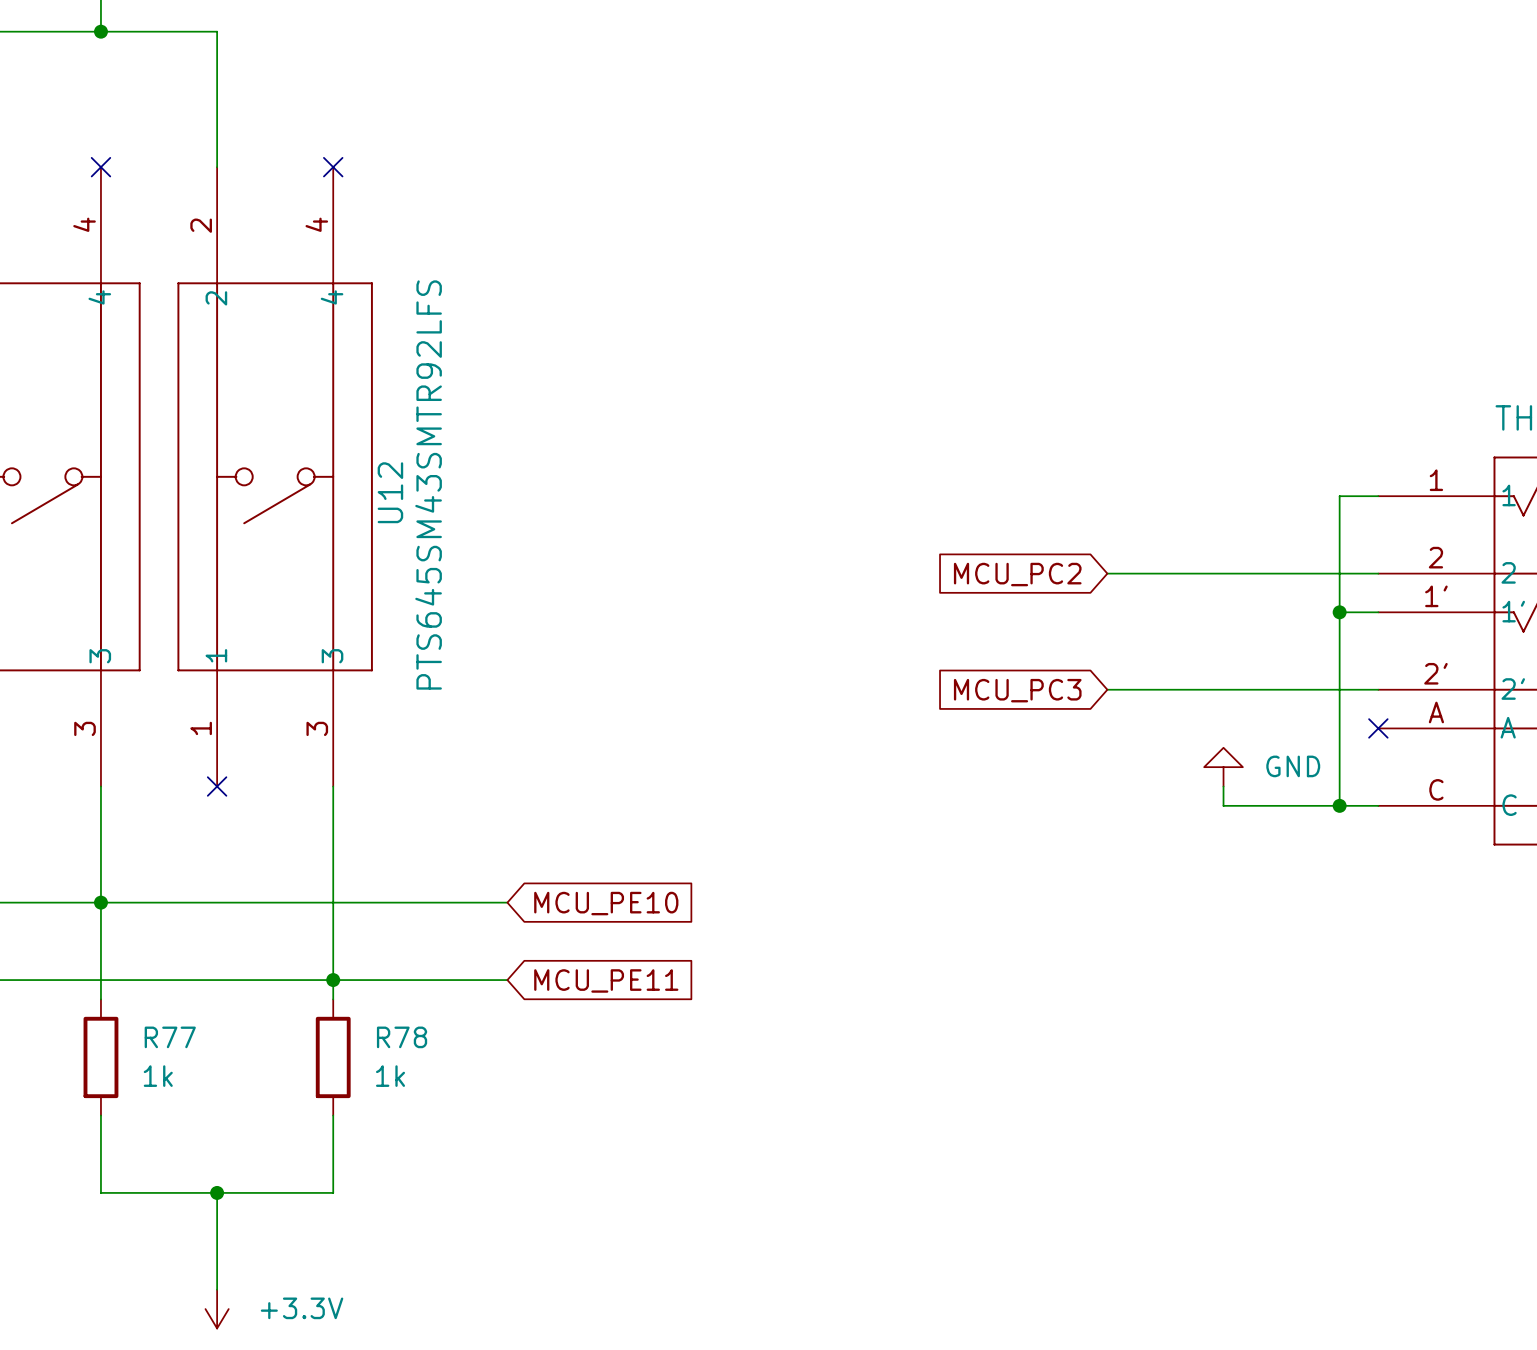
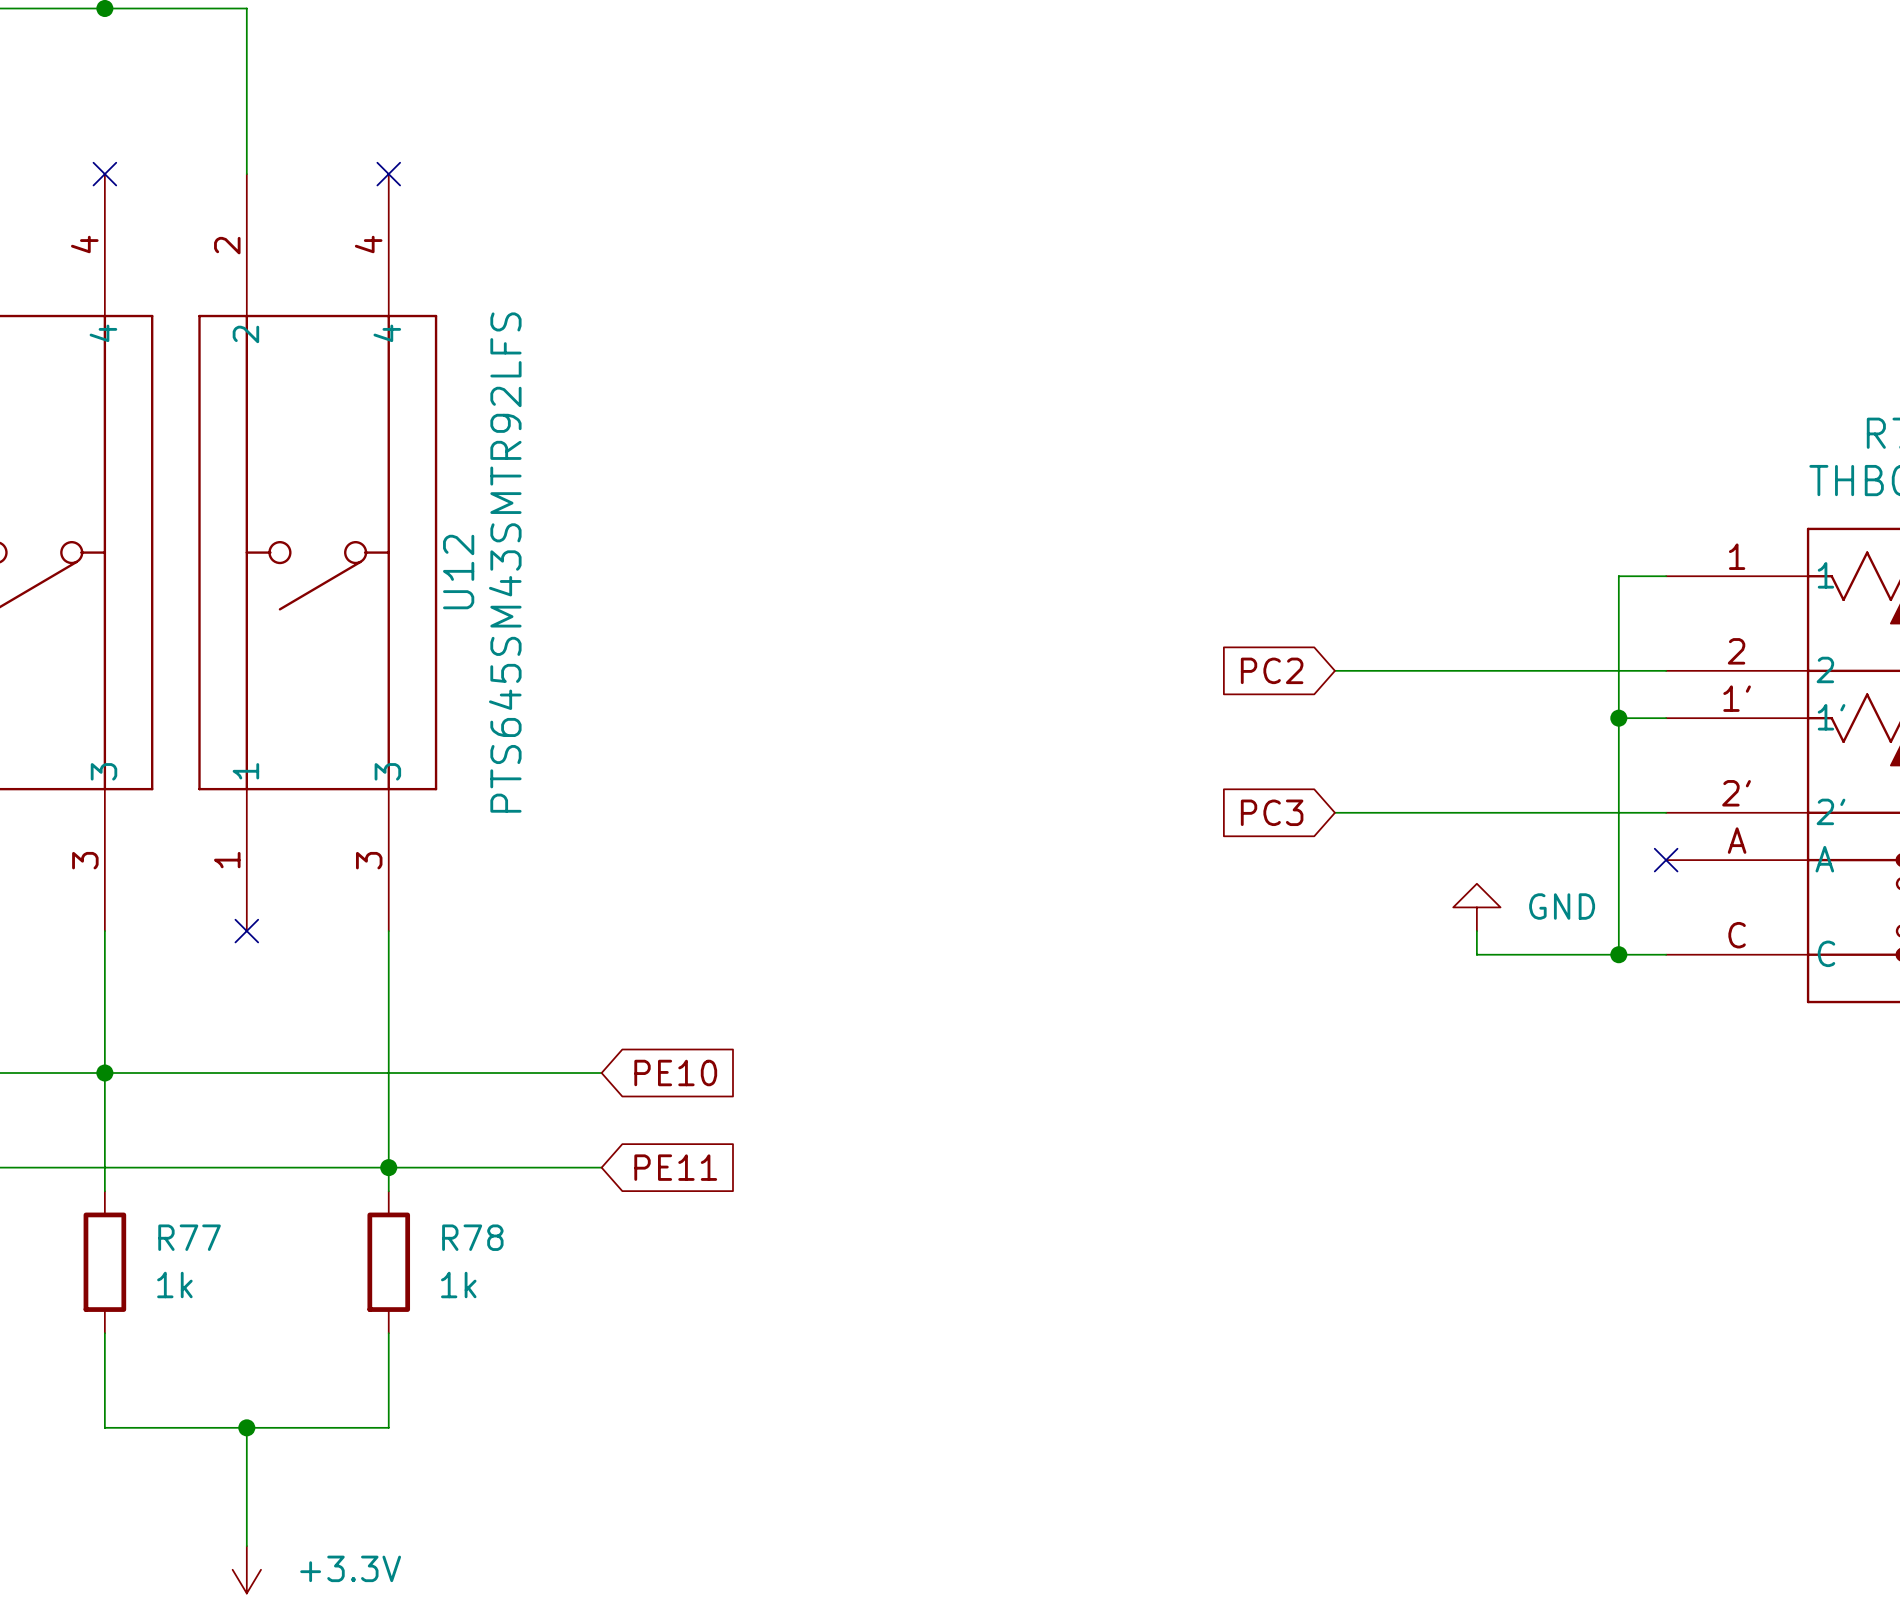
global label: MCU_PC2 (1017, 574) -> PC2 (1272, 670)
global label: MCU_PC3 (1017, 690) -> PC3 (1272, 812)
global label: MCU_PE10 (606, 903) -> PE10 (675, 1073)
global label: MCU_PE11 (606, 980) -> PE11 (675, 1167)

